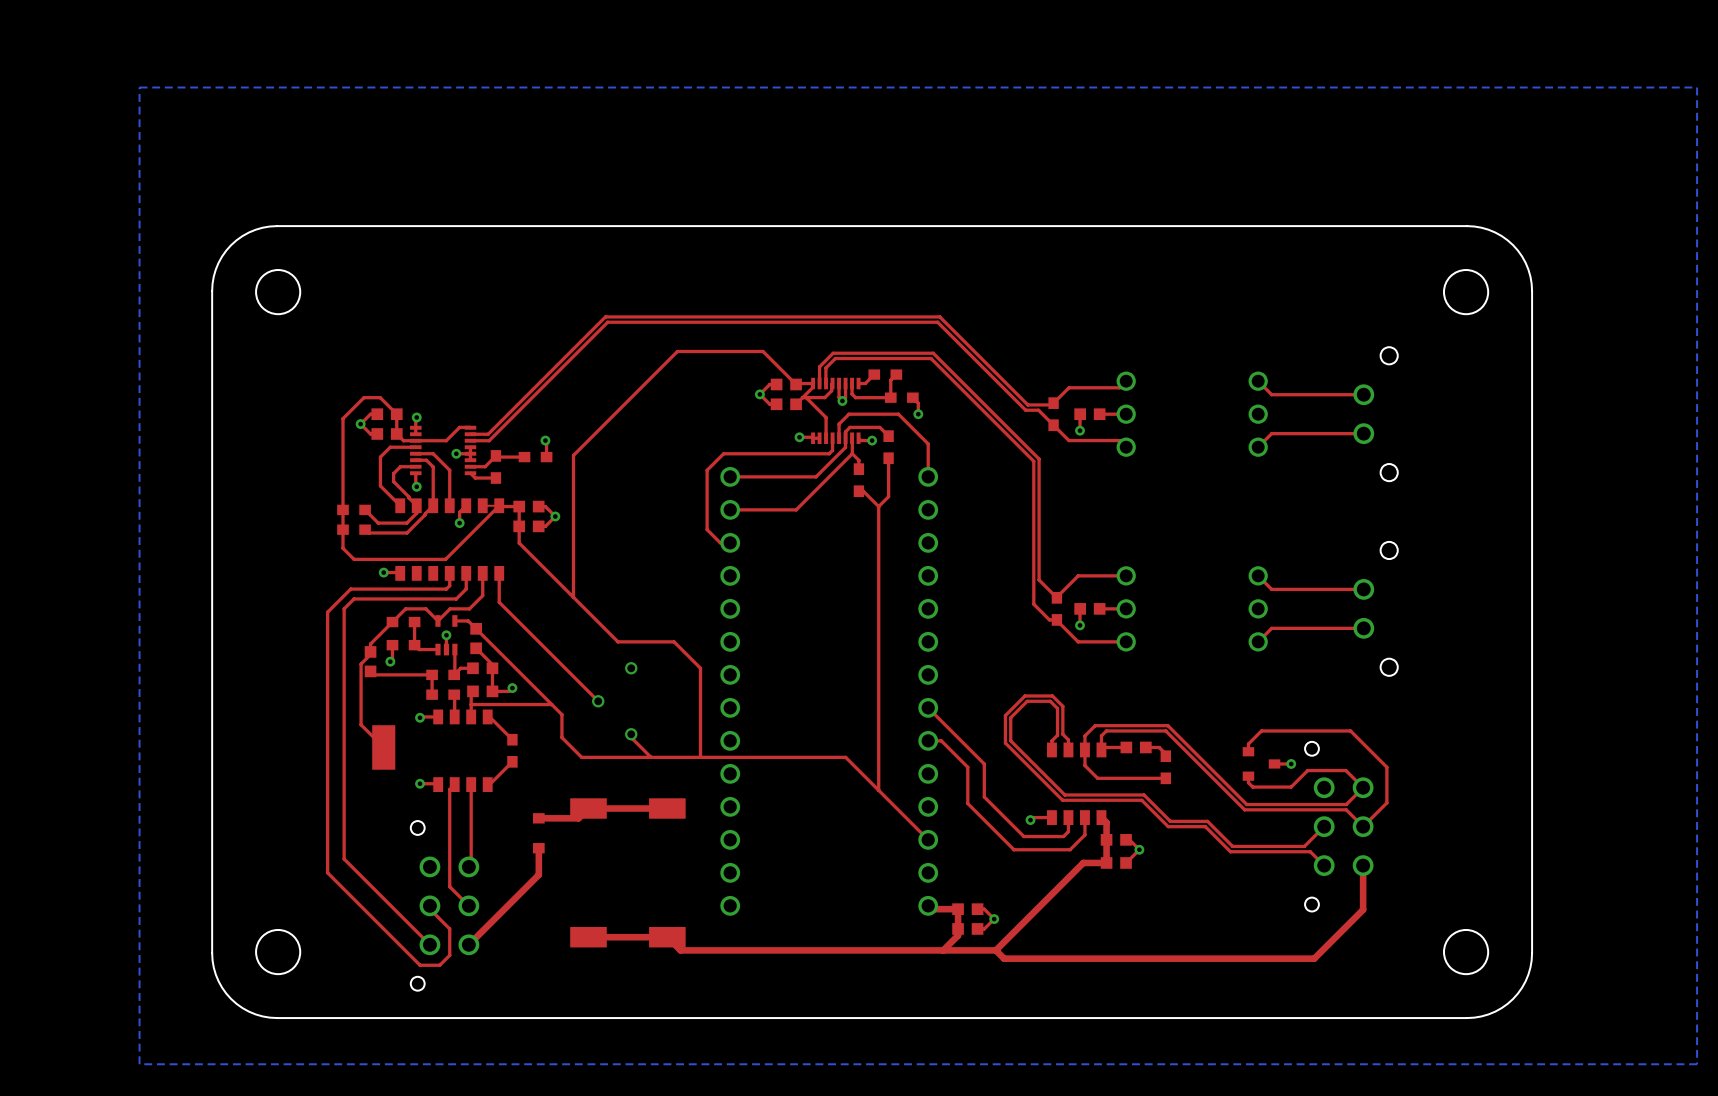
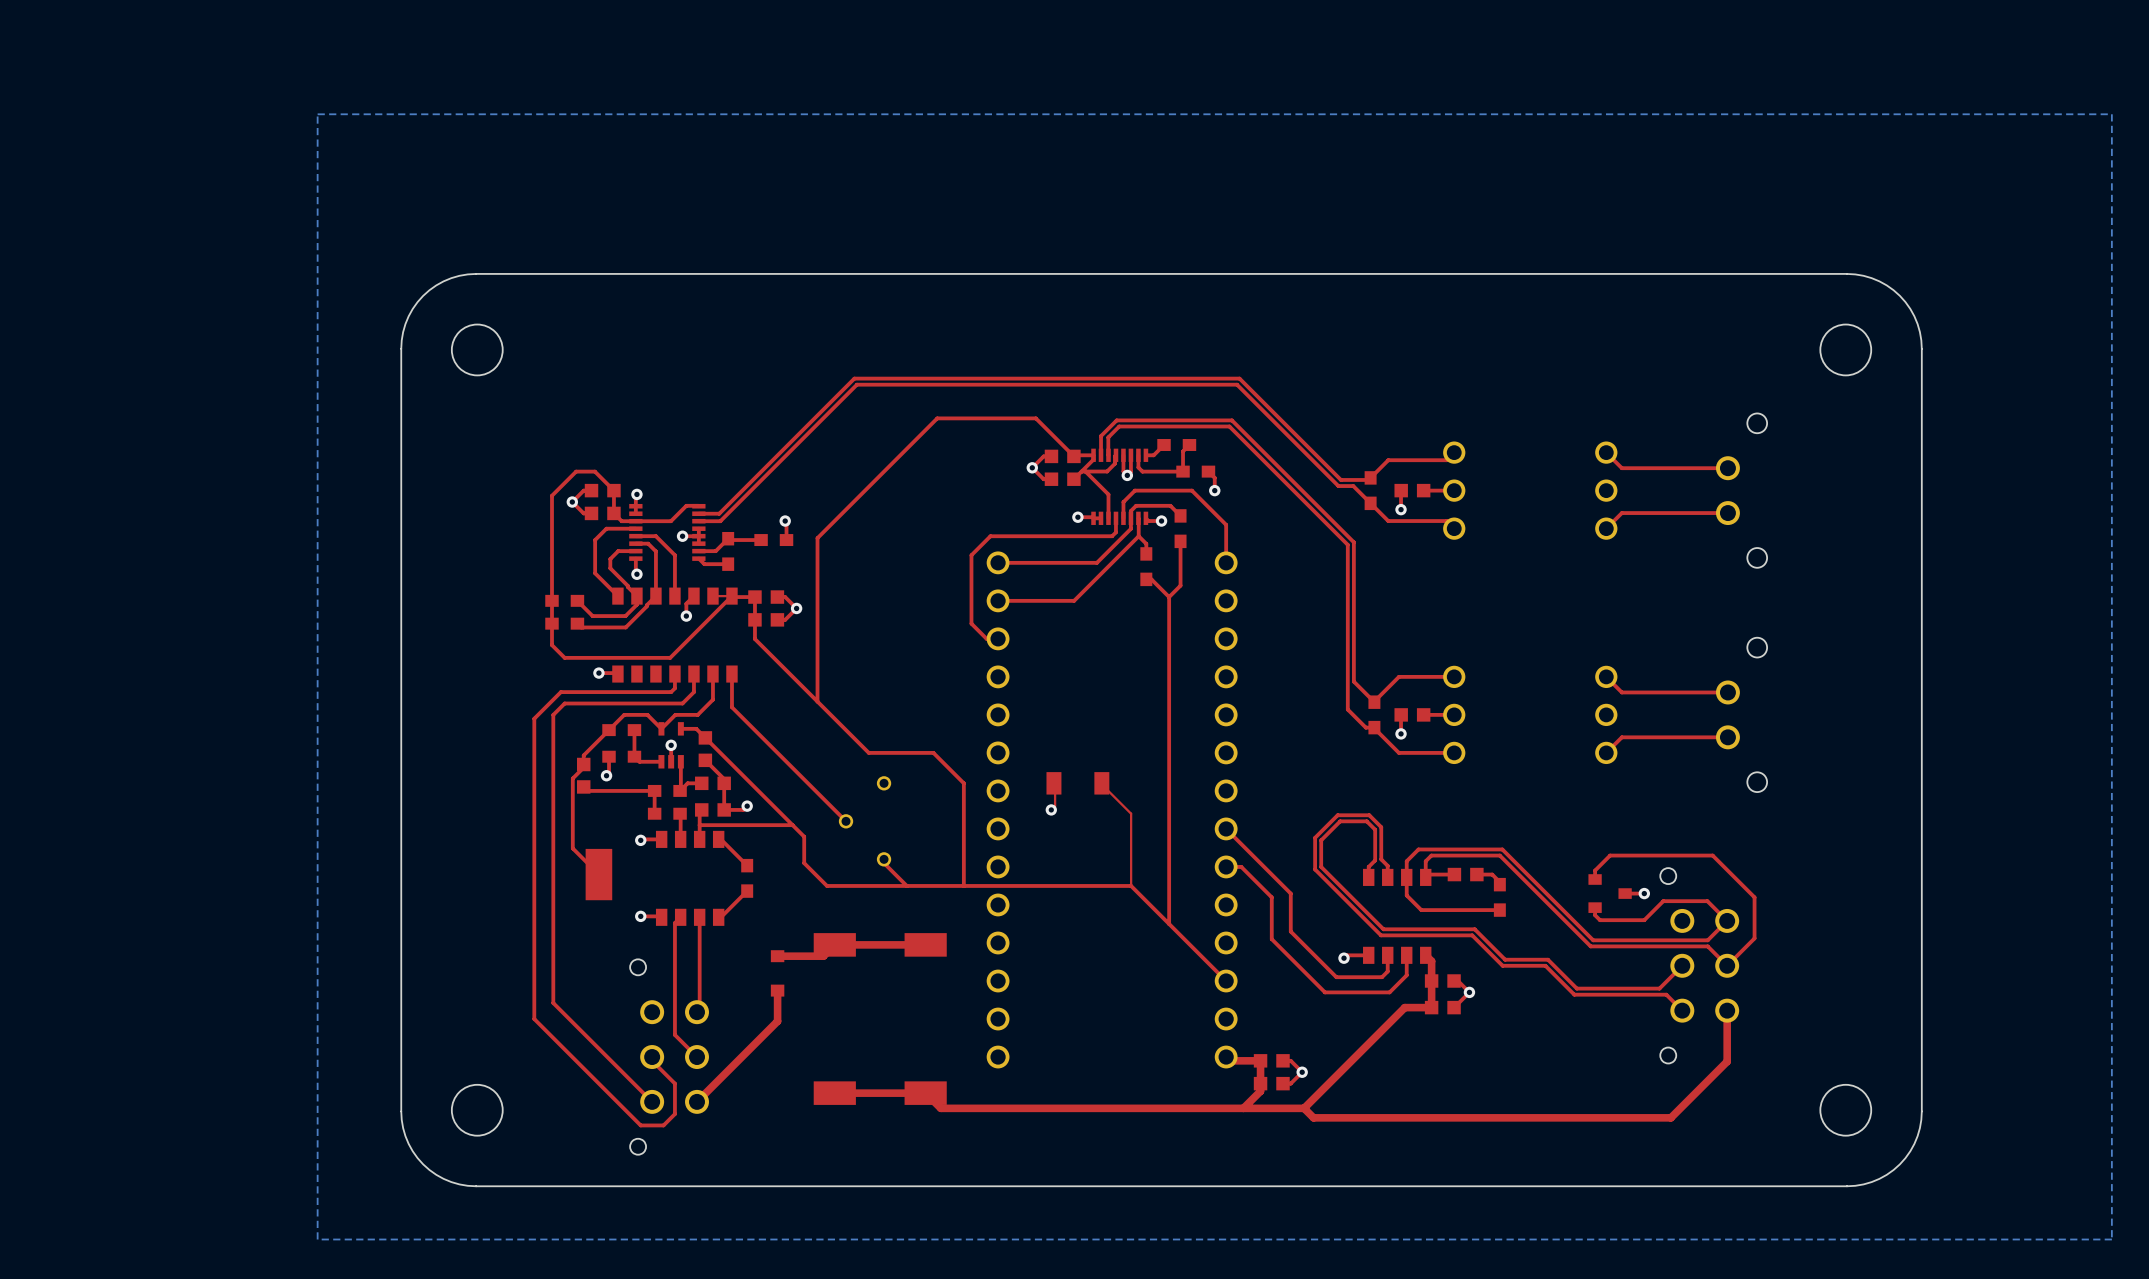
top track: none -> (1055, 783) (1055, 806) (1051, 809)
part: none -> (1077, 783)
top track: none -> (1100, 783) (1131, 813) (1131, 885)
via: none -> (1051, 809)

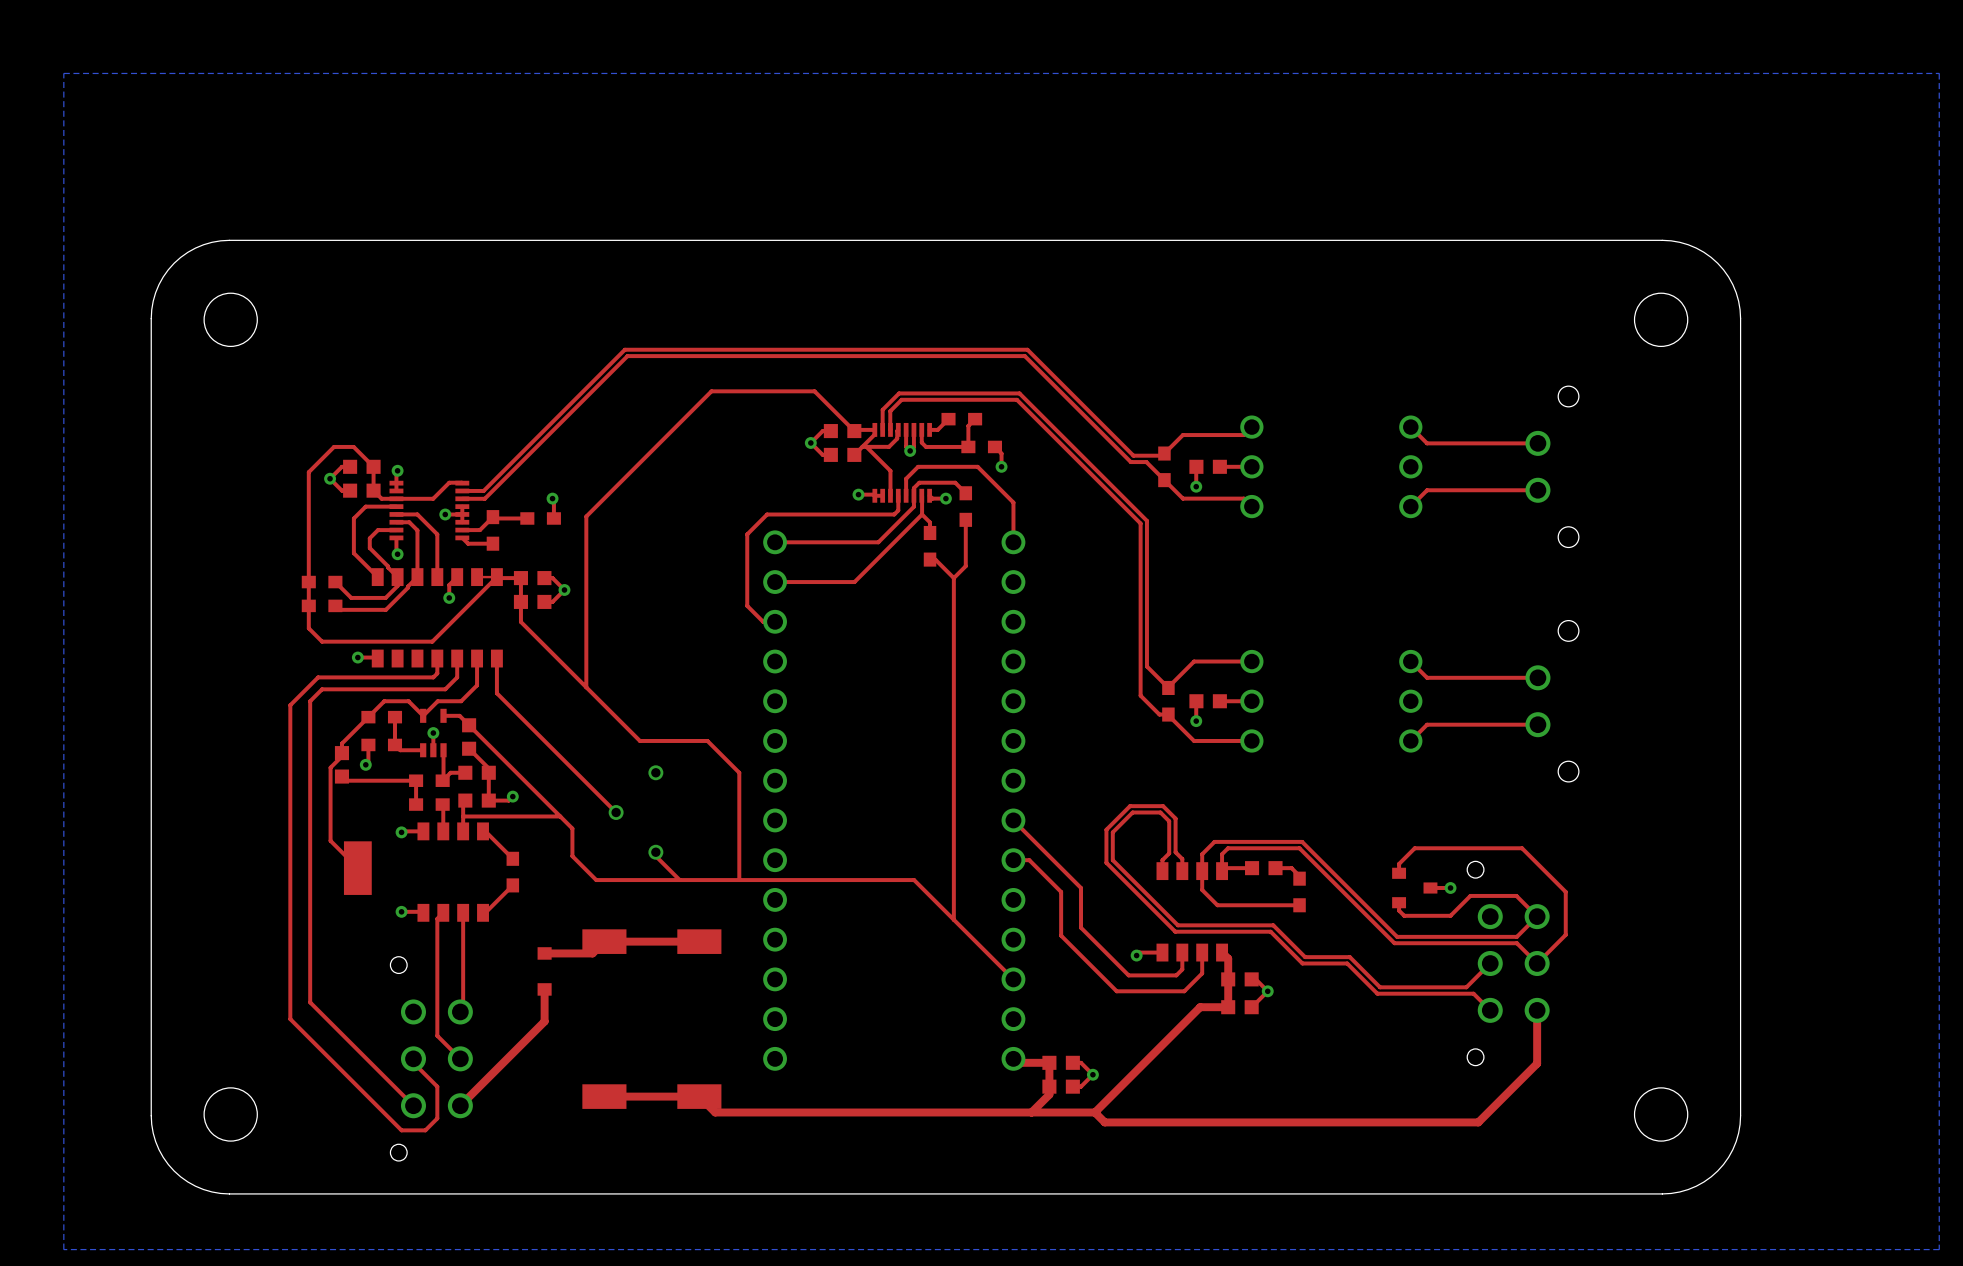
top track: (1055, 783) (1055, 806) (1051, 809) -> none
part: (1077, 783) -> none
top track: (1100, 783) (1131, 813) (1131, 885) -> none
via: (1051, 809) -> none

